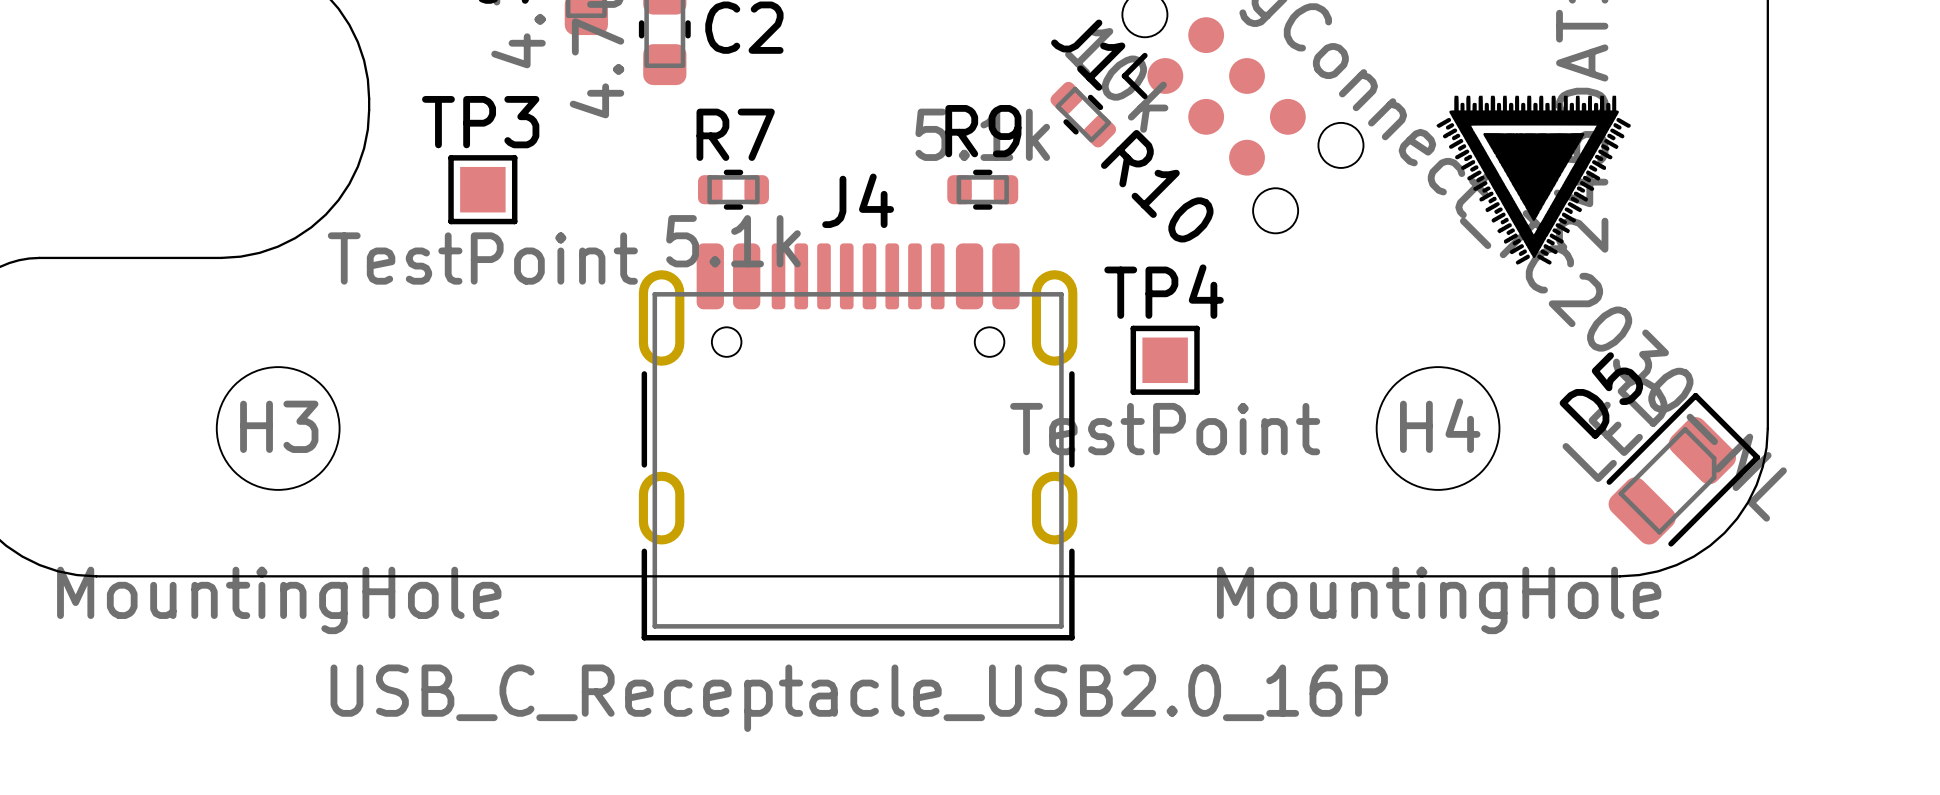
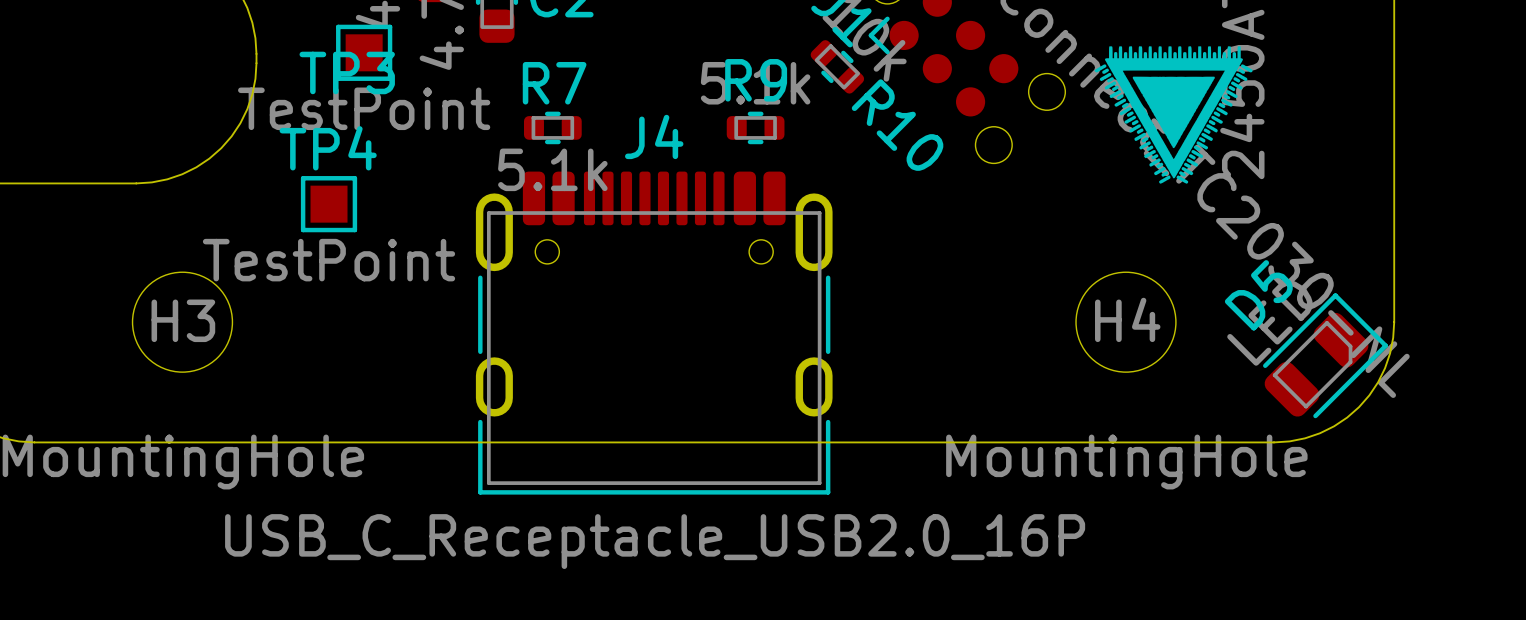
drawing position: (1533, 180) -> (1173, 114)
TP3 position: (482, 189) -> (364, 52)
TP4 position: (1165, 360) -> (329, 204)

